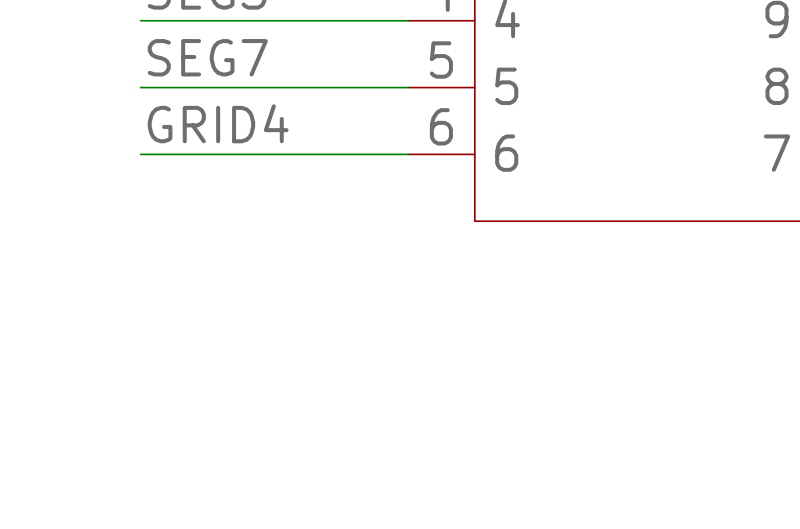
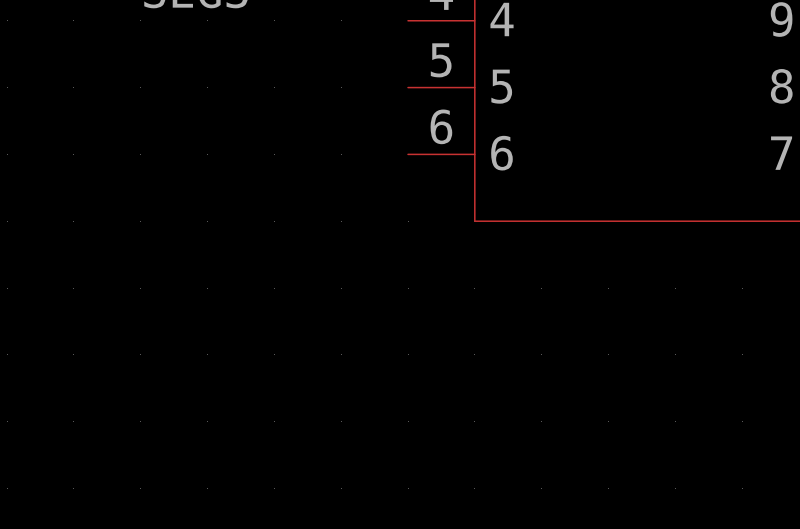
wire: (140, 20) (408, 20) -> none
label: SEG7 (207, 57) -> none
wire: (140, 87) (408, 87) -> none
label: GRID4 (218, 123) -> none
wire: (140, 154) (408, 154) -> none

